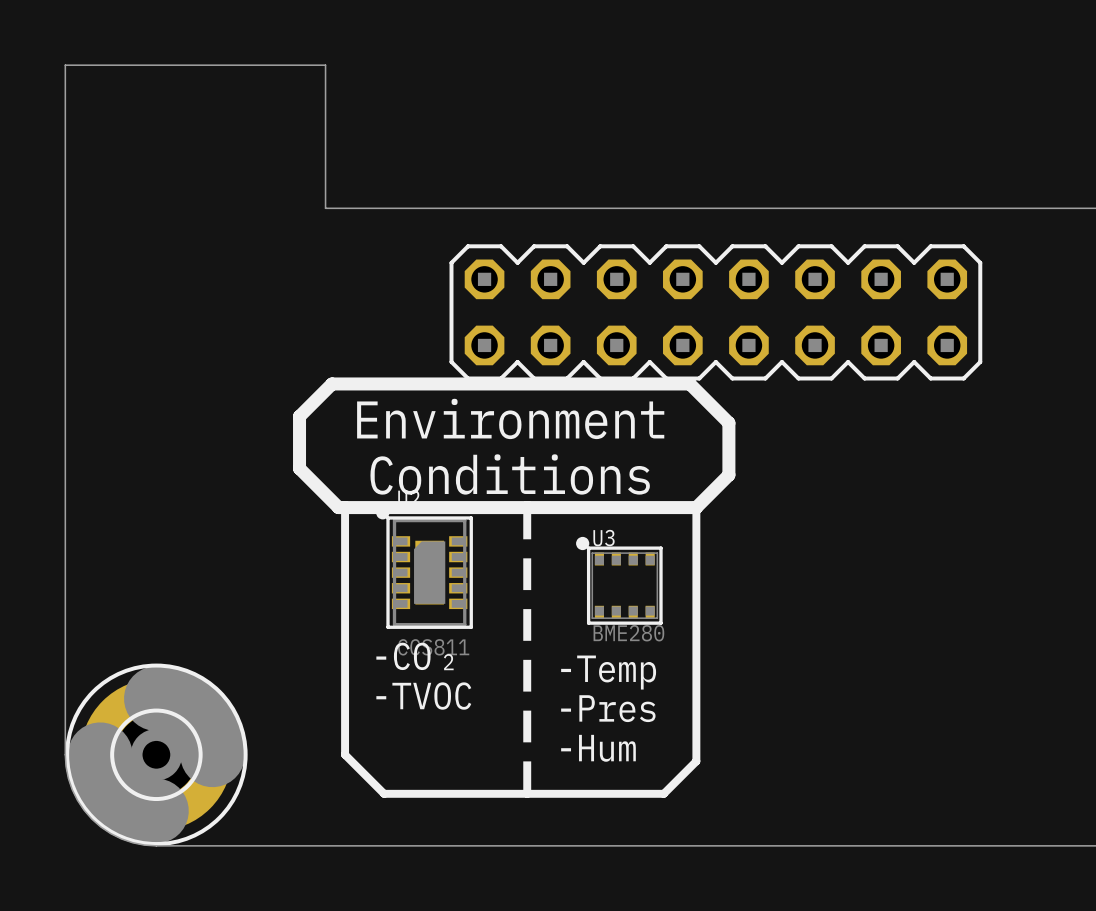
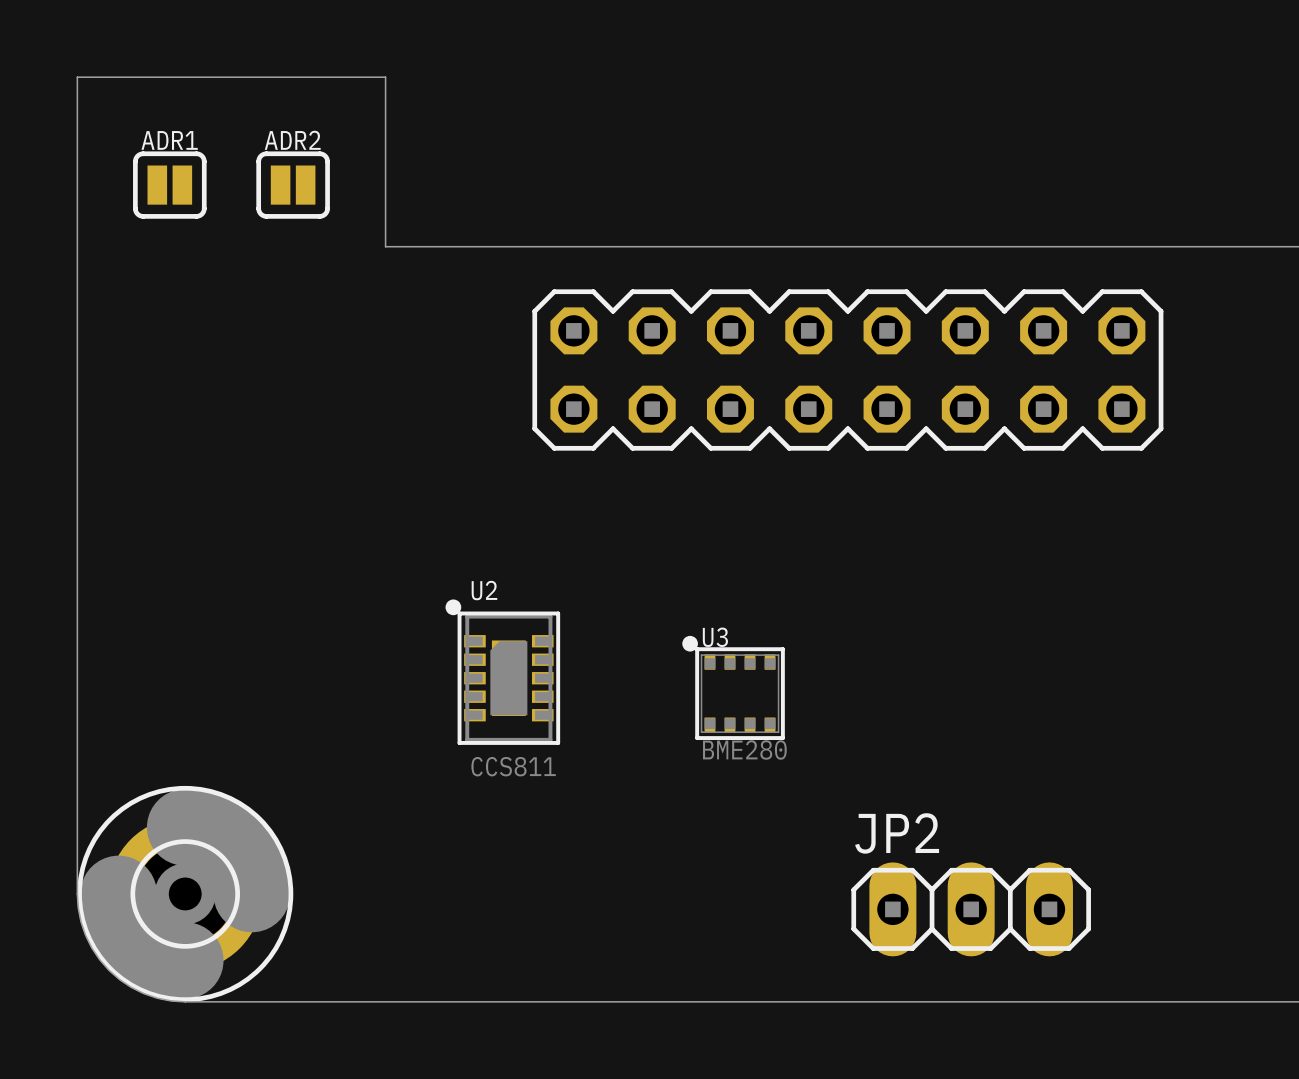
ADR1: none -> (169, 185)
ADR2: none -> (293, 185)
text: Environment (510, 418) -> none
text: Conditions (510, 474) -> none
line: (345, 507) (345, 754) (384, 793) (663, 793) (696, 761) (696, 507) -> none
line: (527, 507) (527, 793) -> none
line: (696, 507) (728, 475) (728, 422) (689, 383) (332, 383) (299, 416) (299, 468) (338, 507) (696, 507) -> none
text: -CO (403, 656) -> none
text: 2 (448, 662) -> none
part footprint: [65, 663, 248, 847] -> [77, 785, 294, 1003]
text: -Temp (608, 672) -> none
text: -TVOC (423, 696) -> none
text: -Pres (608, 708) -> none
text: -Hum (598, 748) -> none
JP2: none -> (971, 909)

